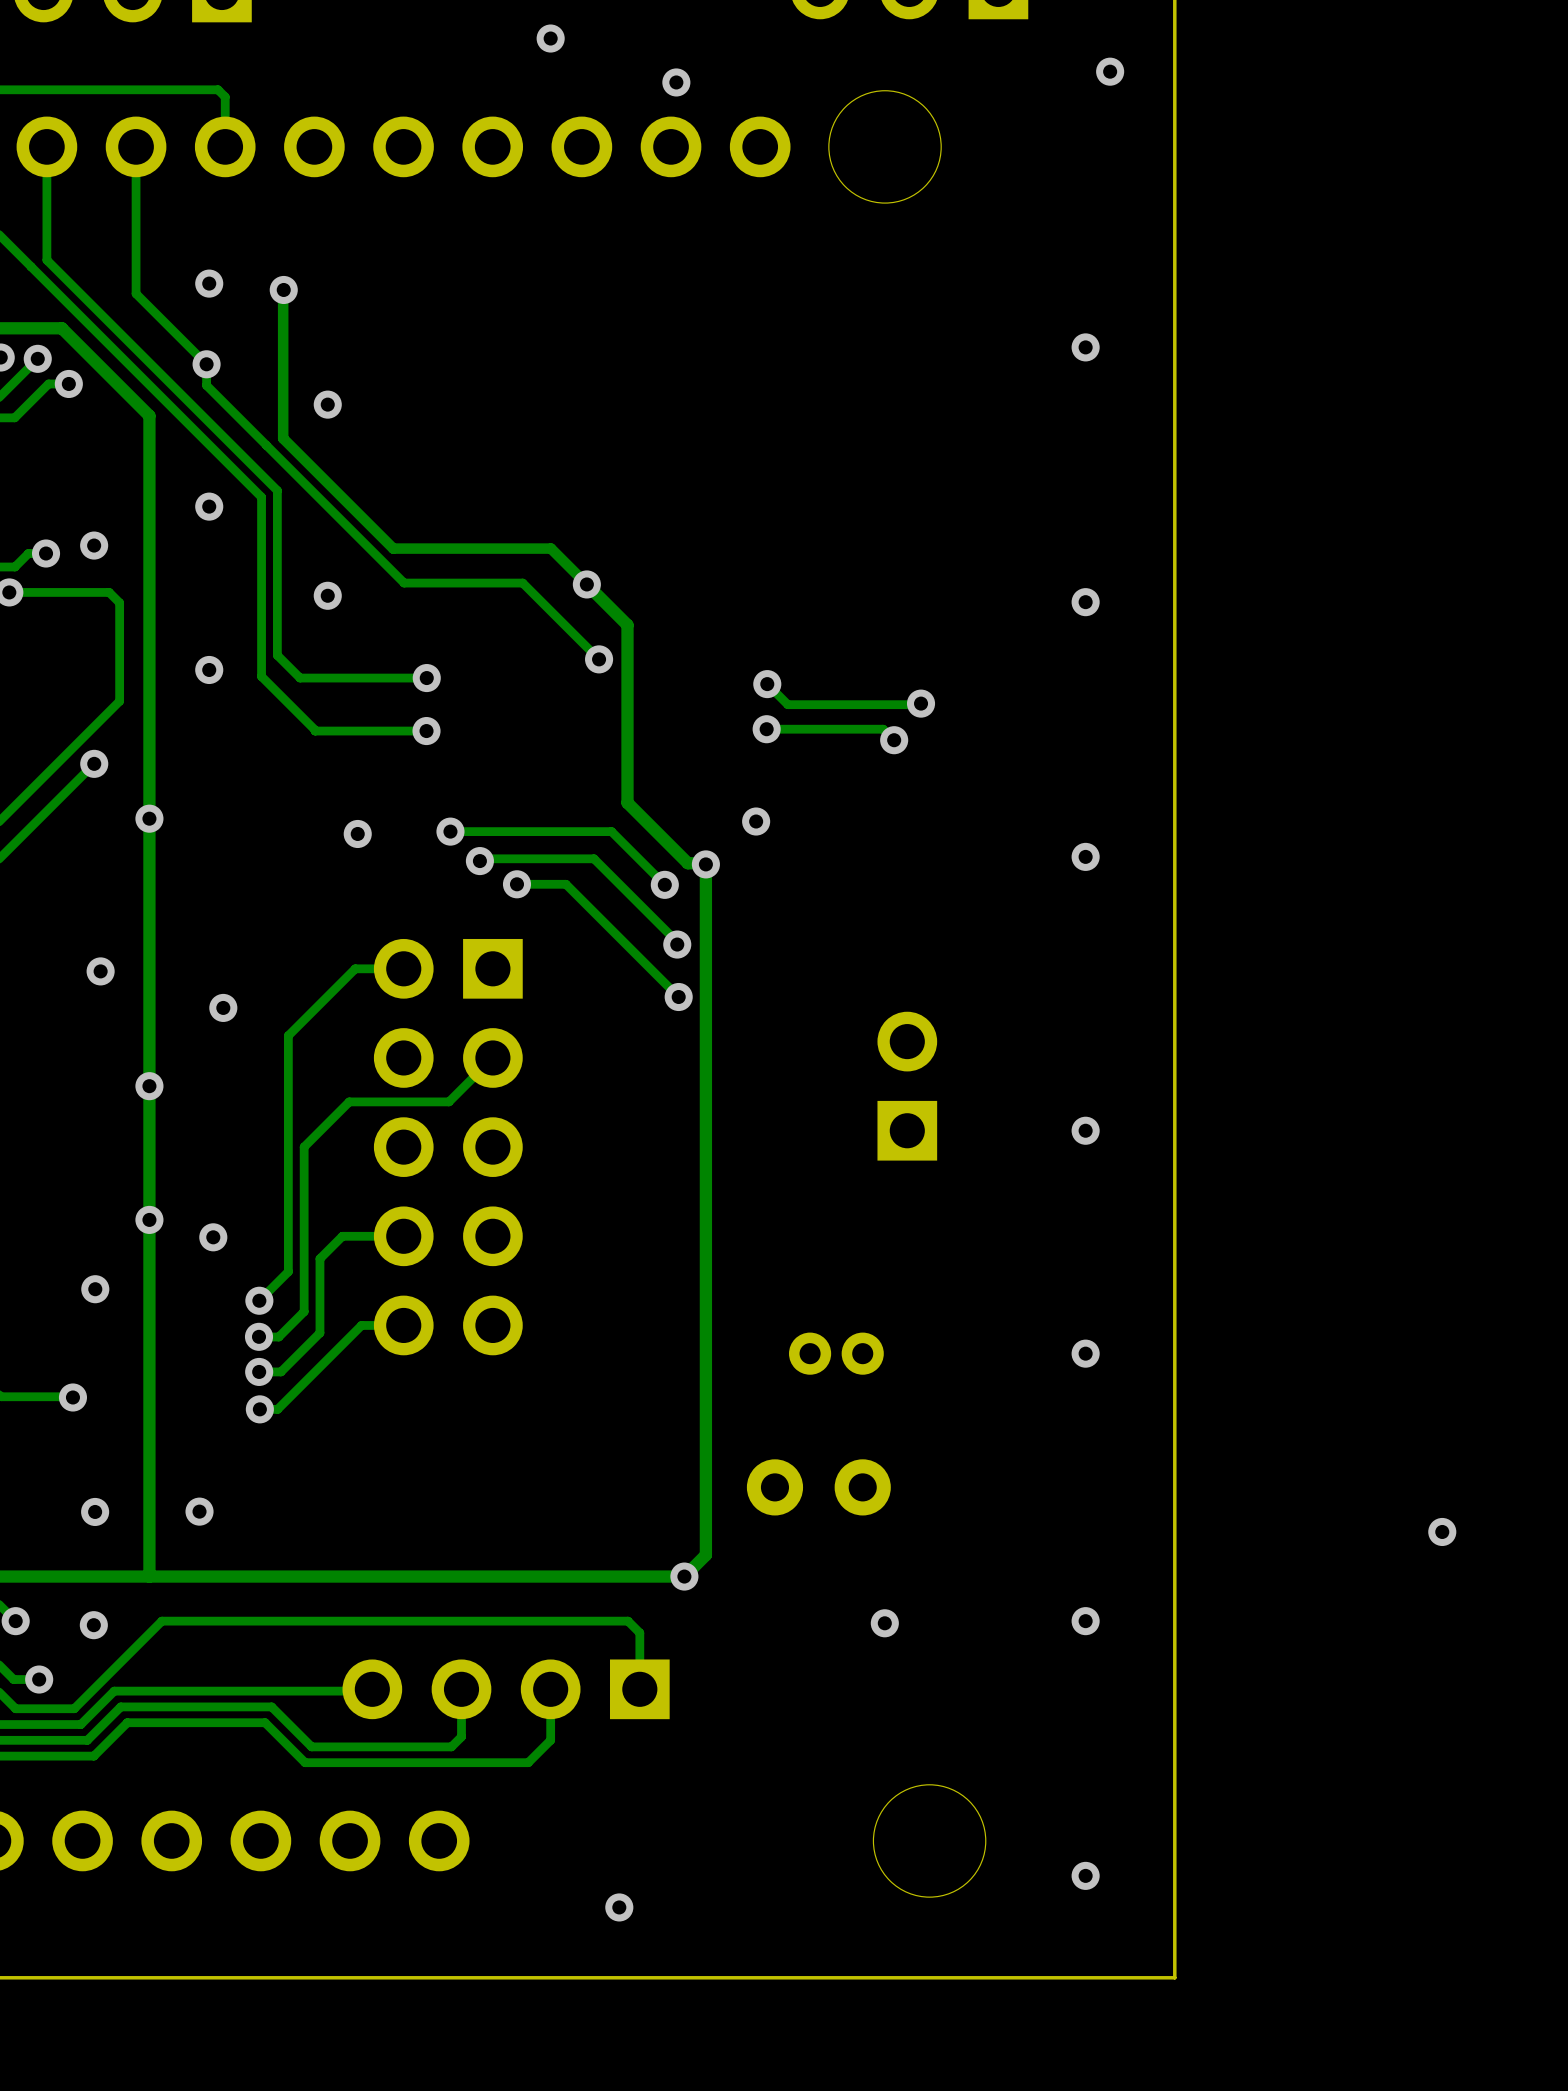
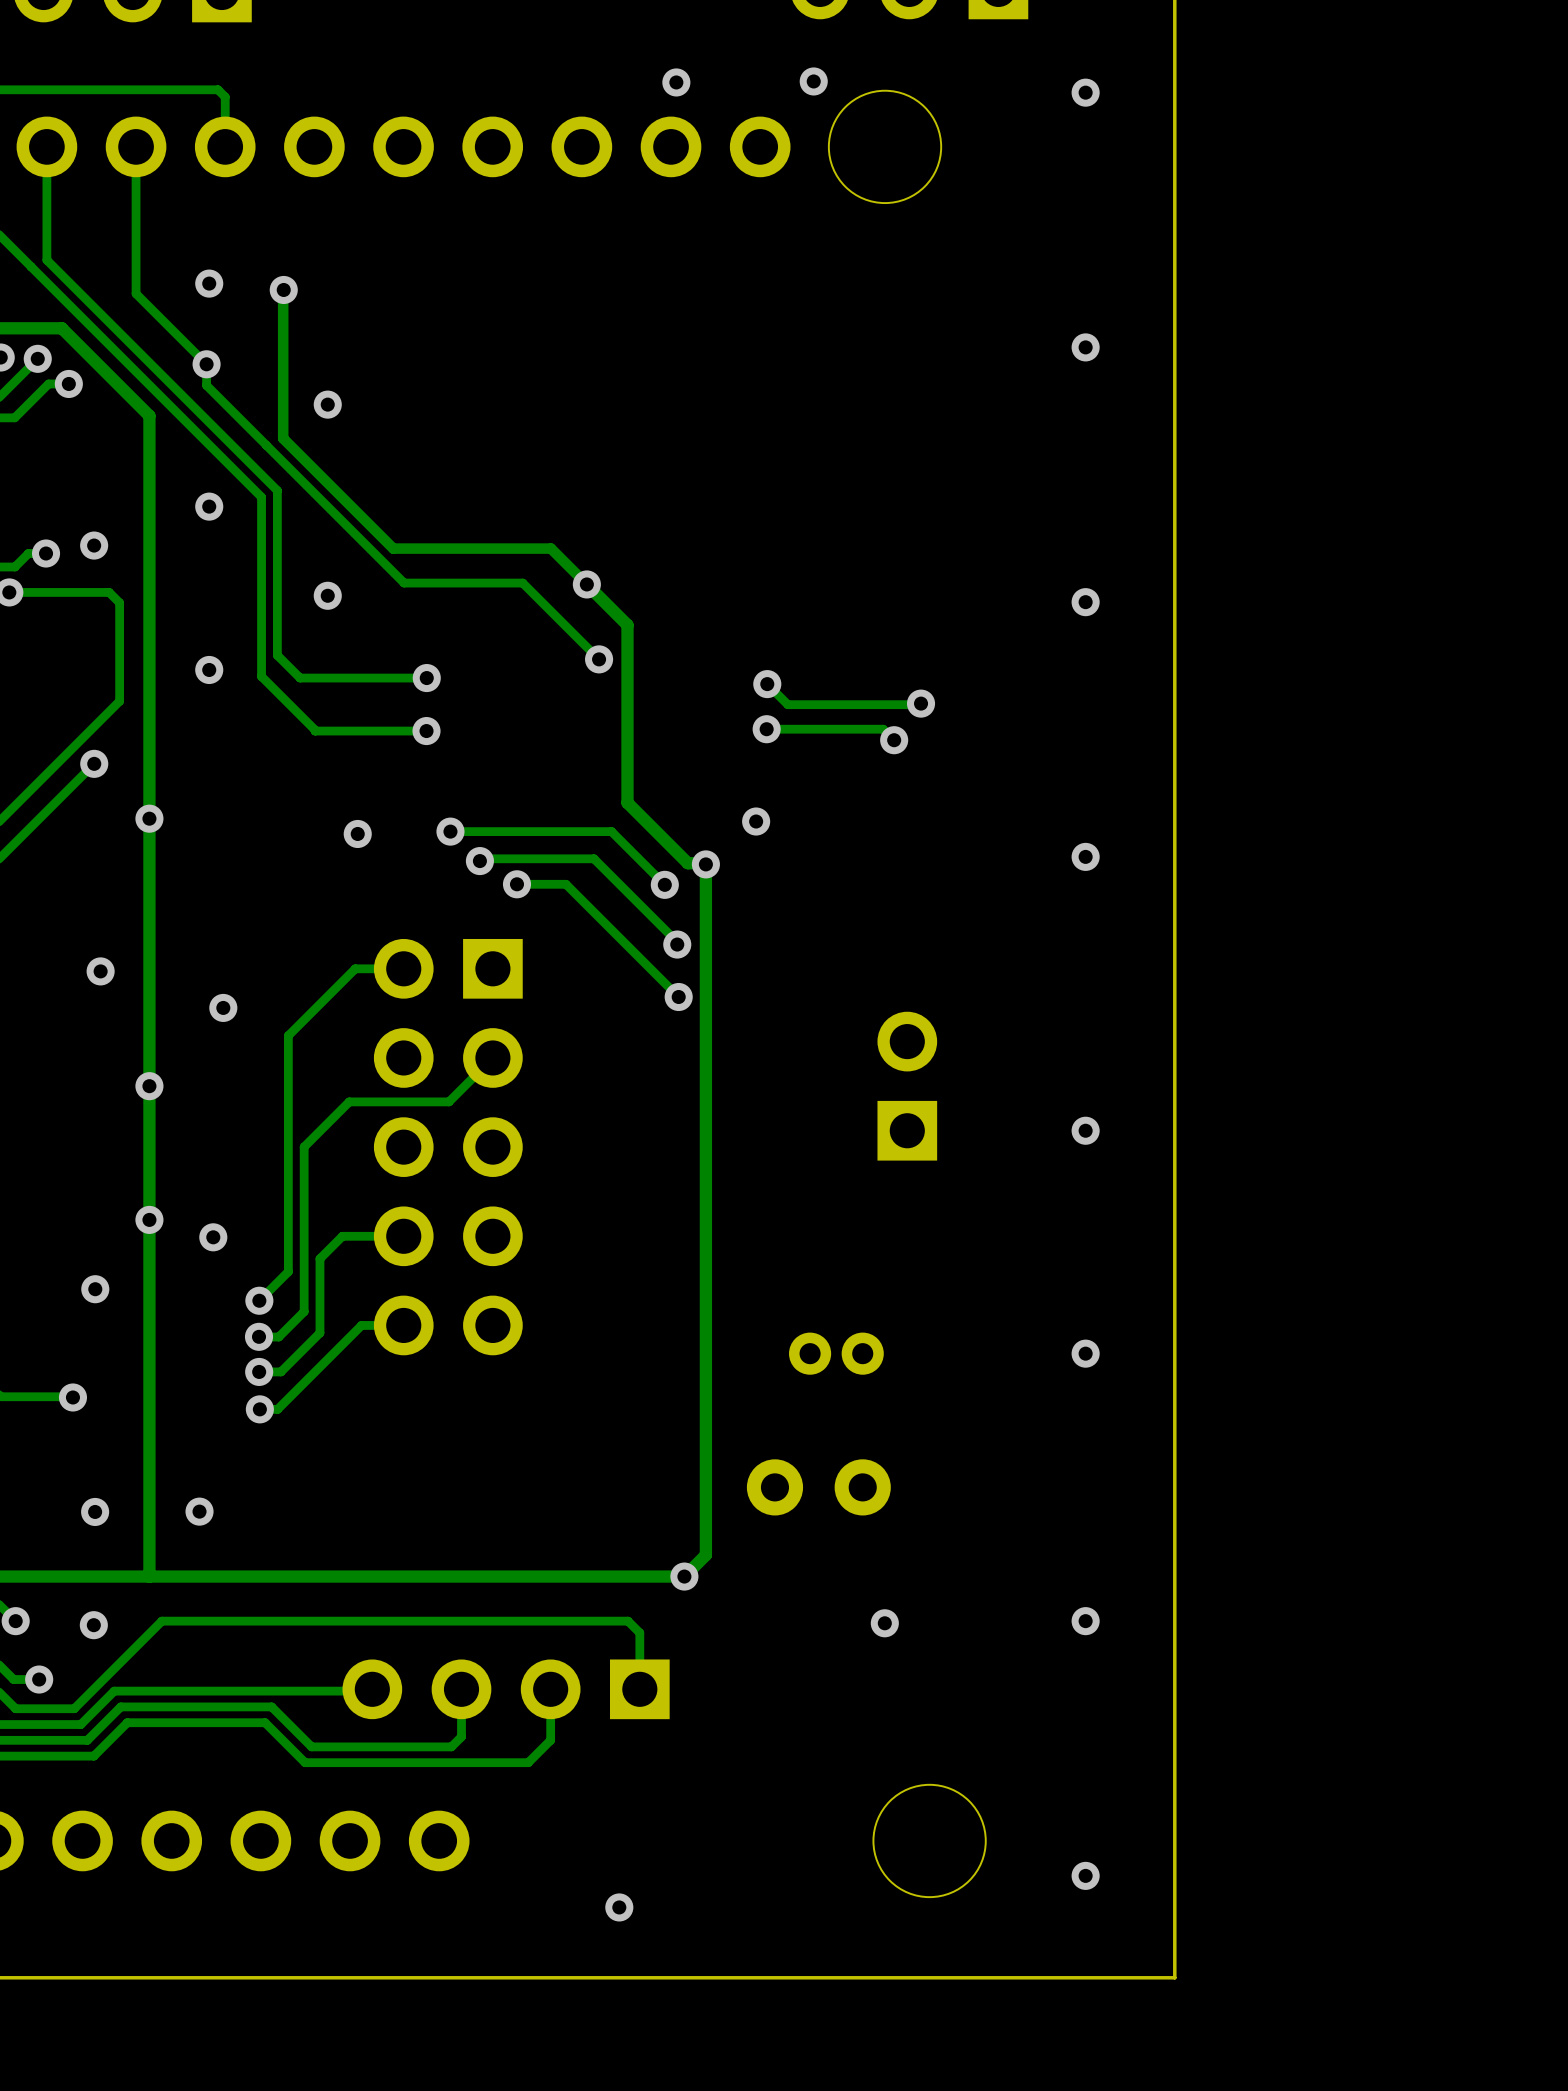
via: (550, 38) -> none
via position: (1110, 71) -> (1085, 92)
via: none -> (813, 81)
via: (1442, 1531) -> none

